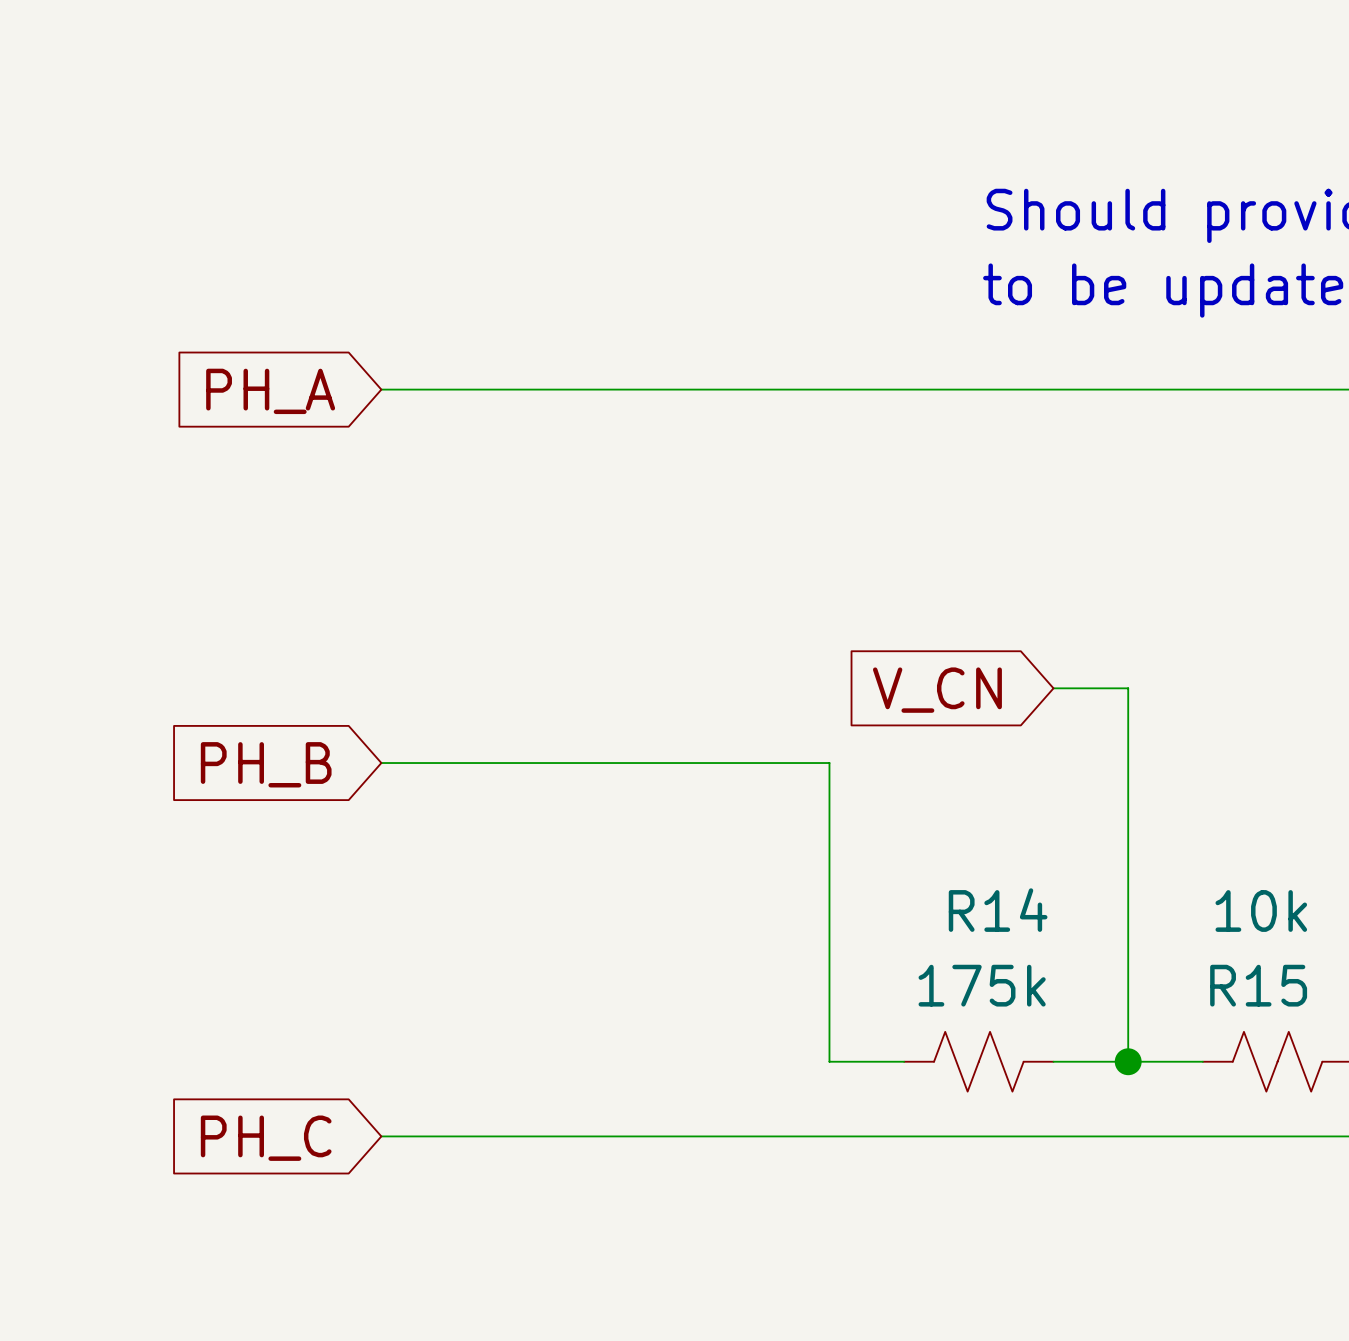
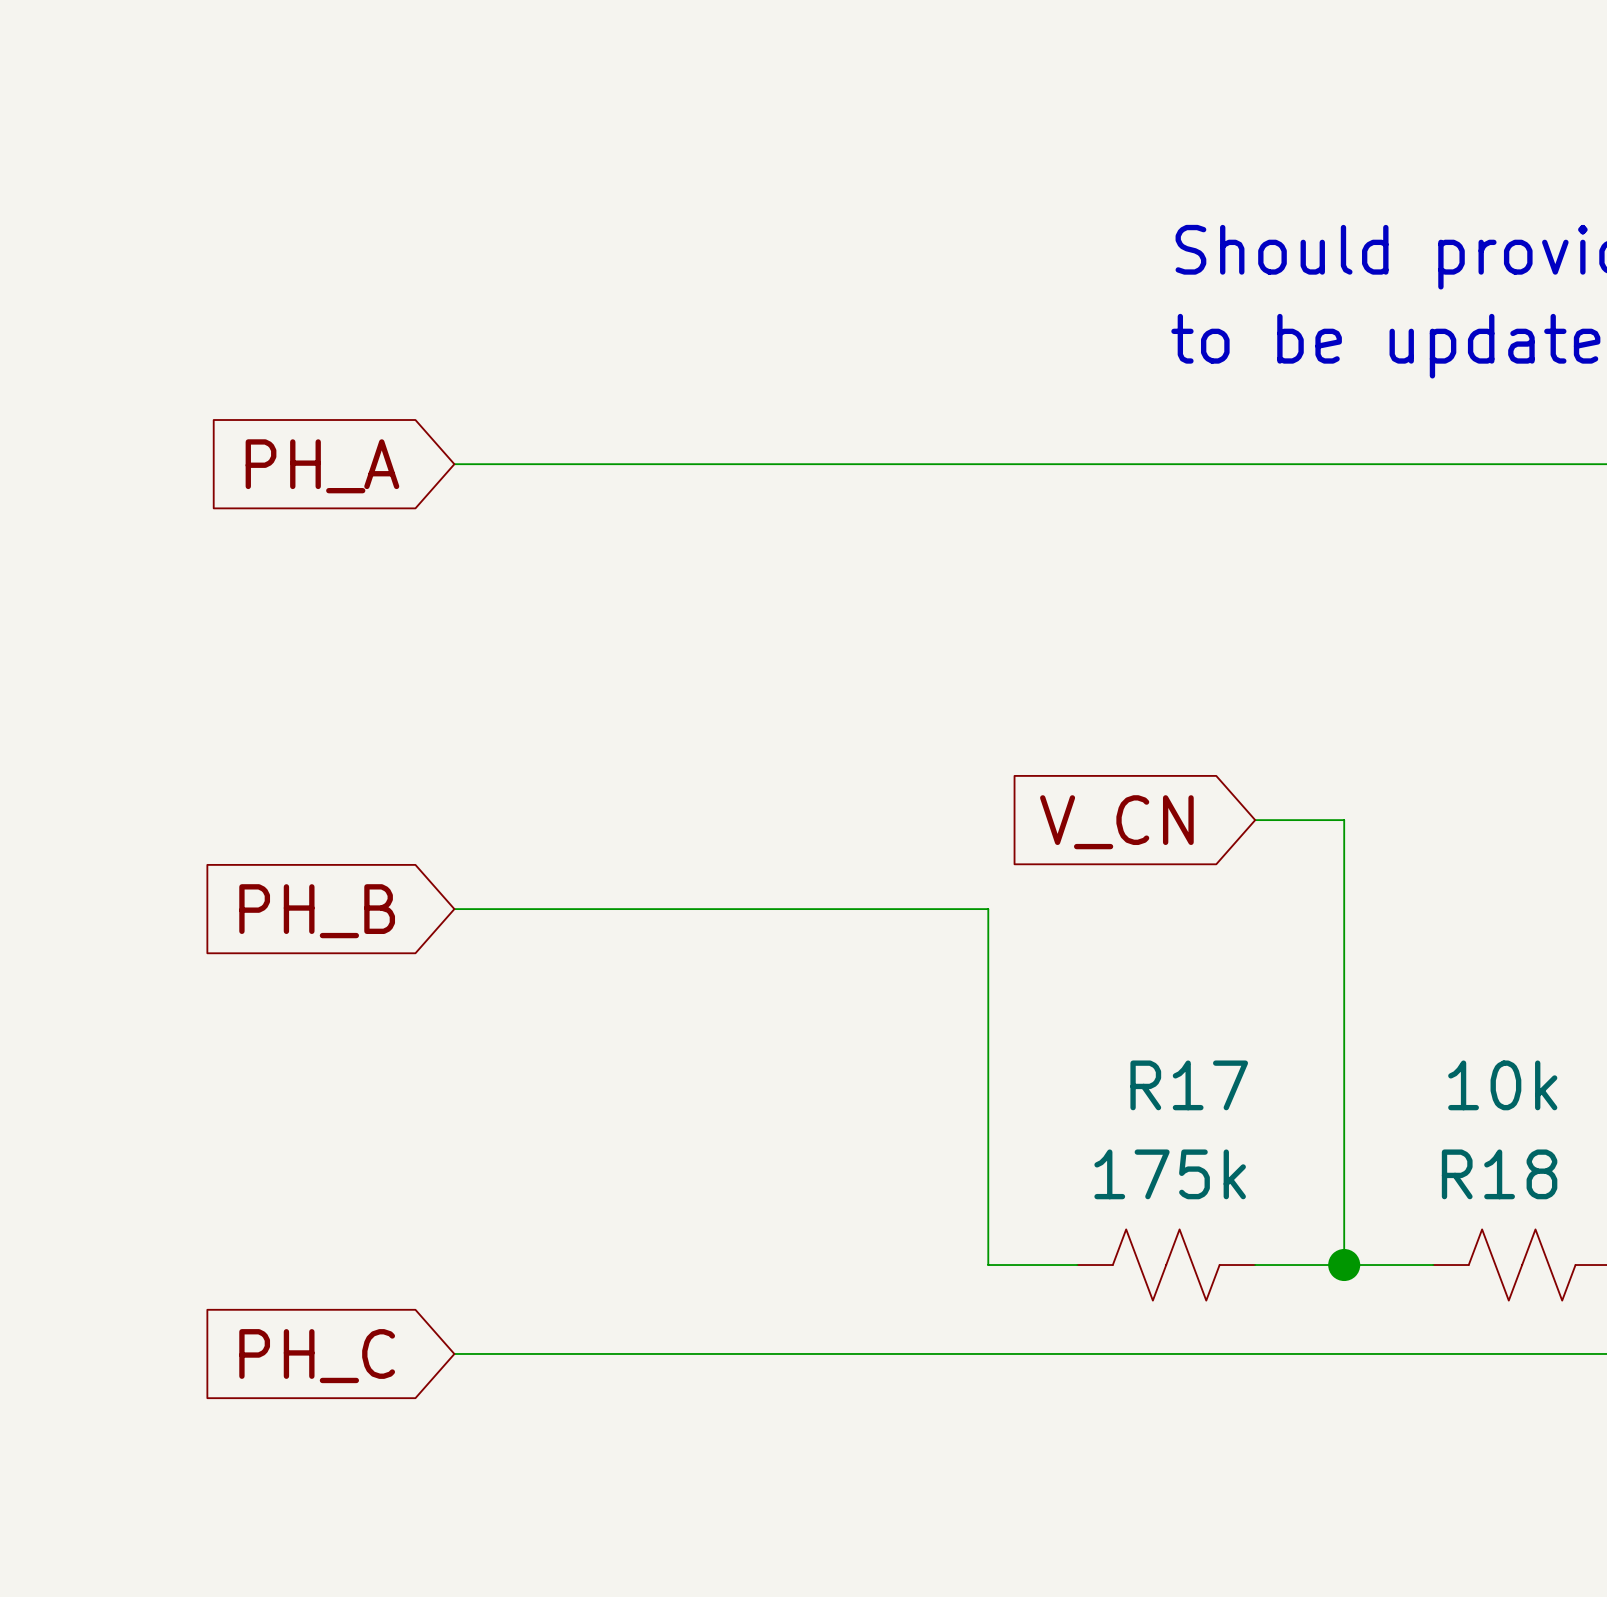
R14 name: R14 (998, 910) -> R17 (1189, 1085)
R15 name: R15 (1258, 985) -> R18 (1499, 1174)

